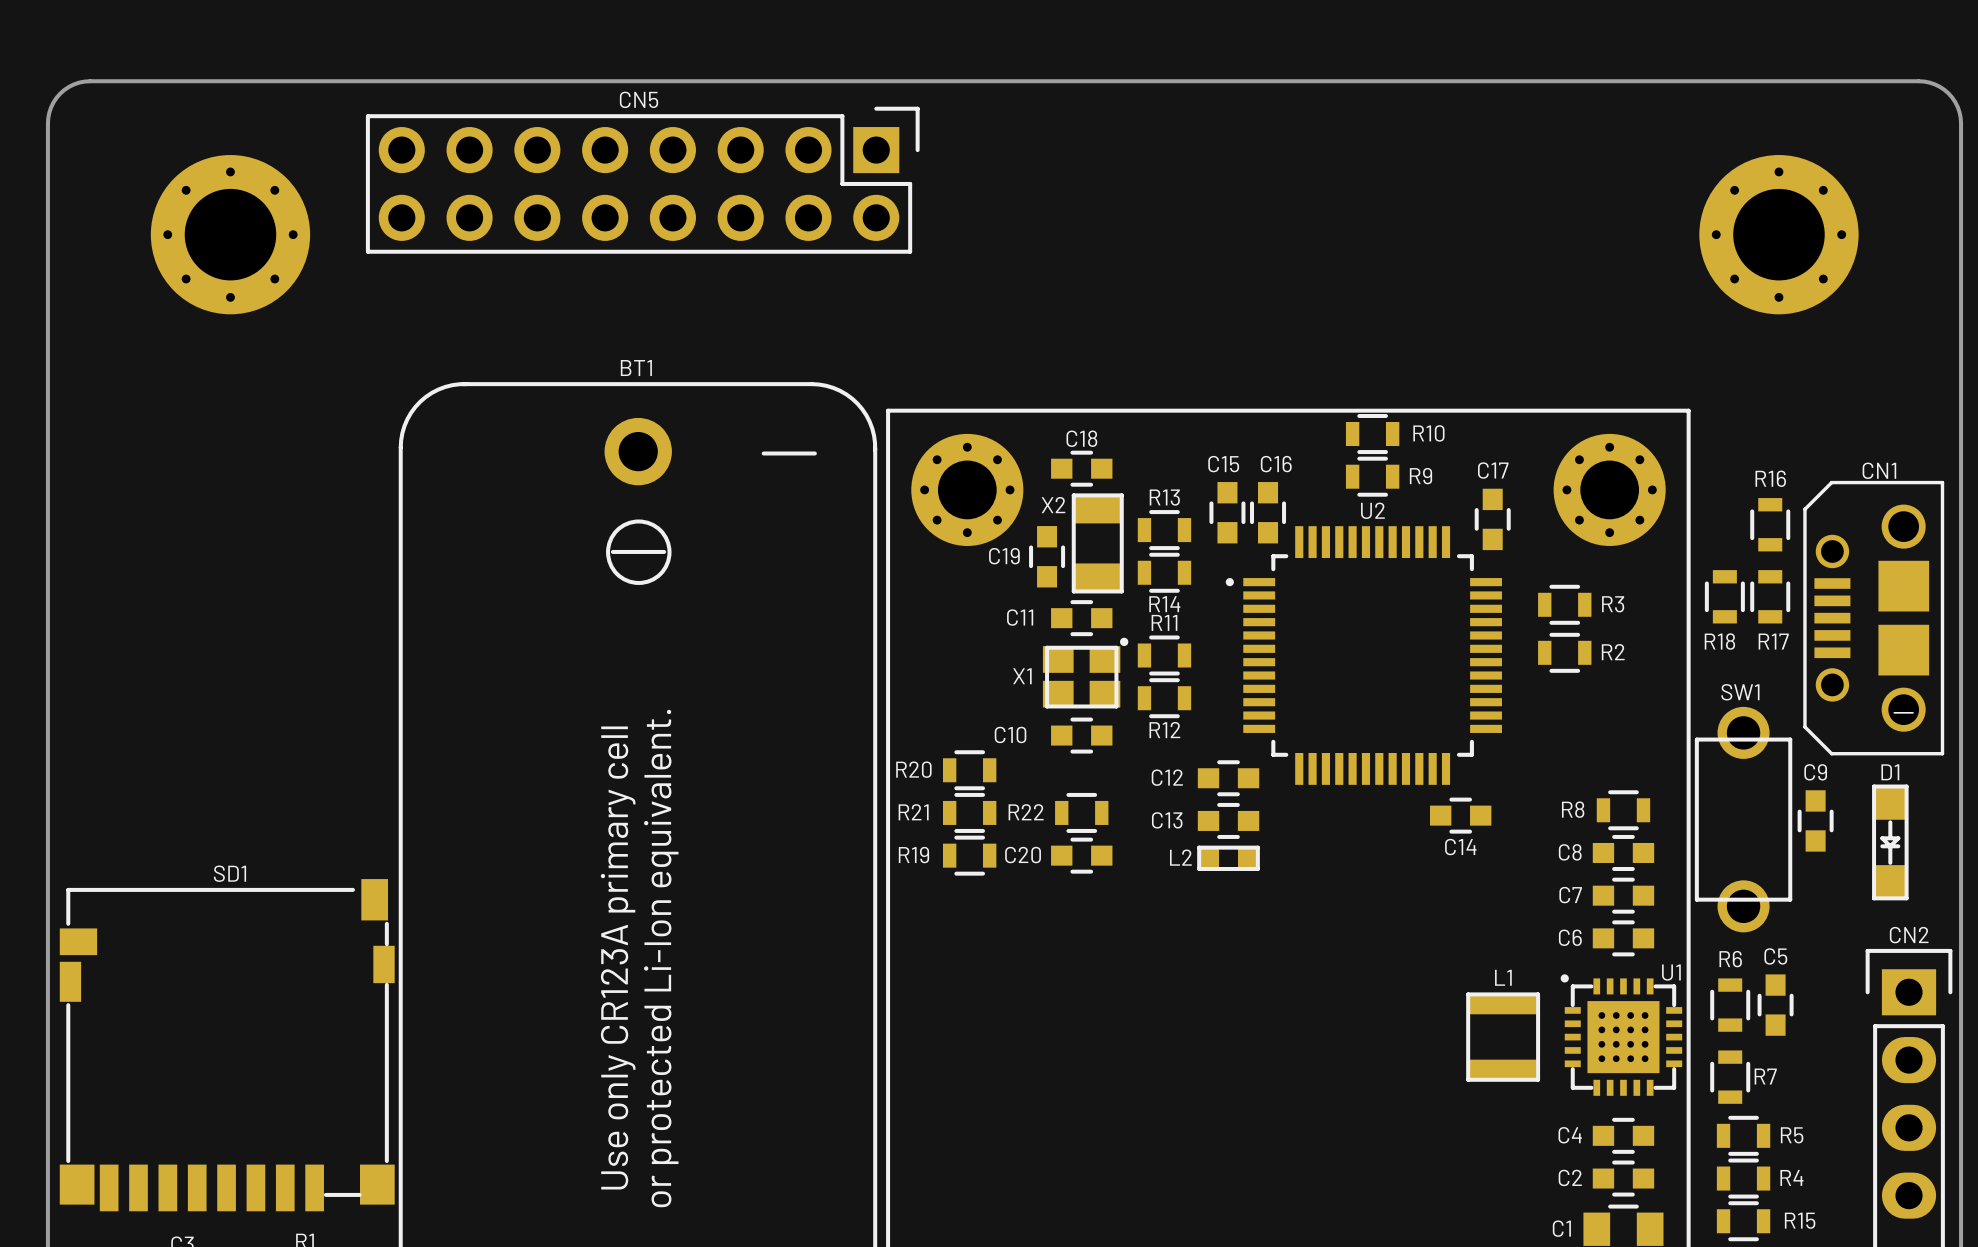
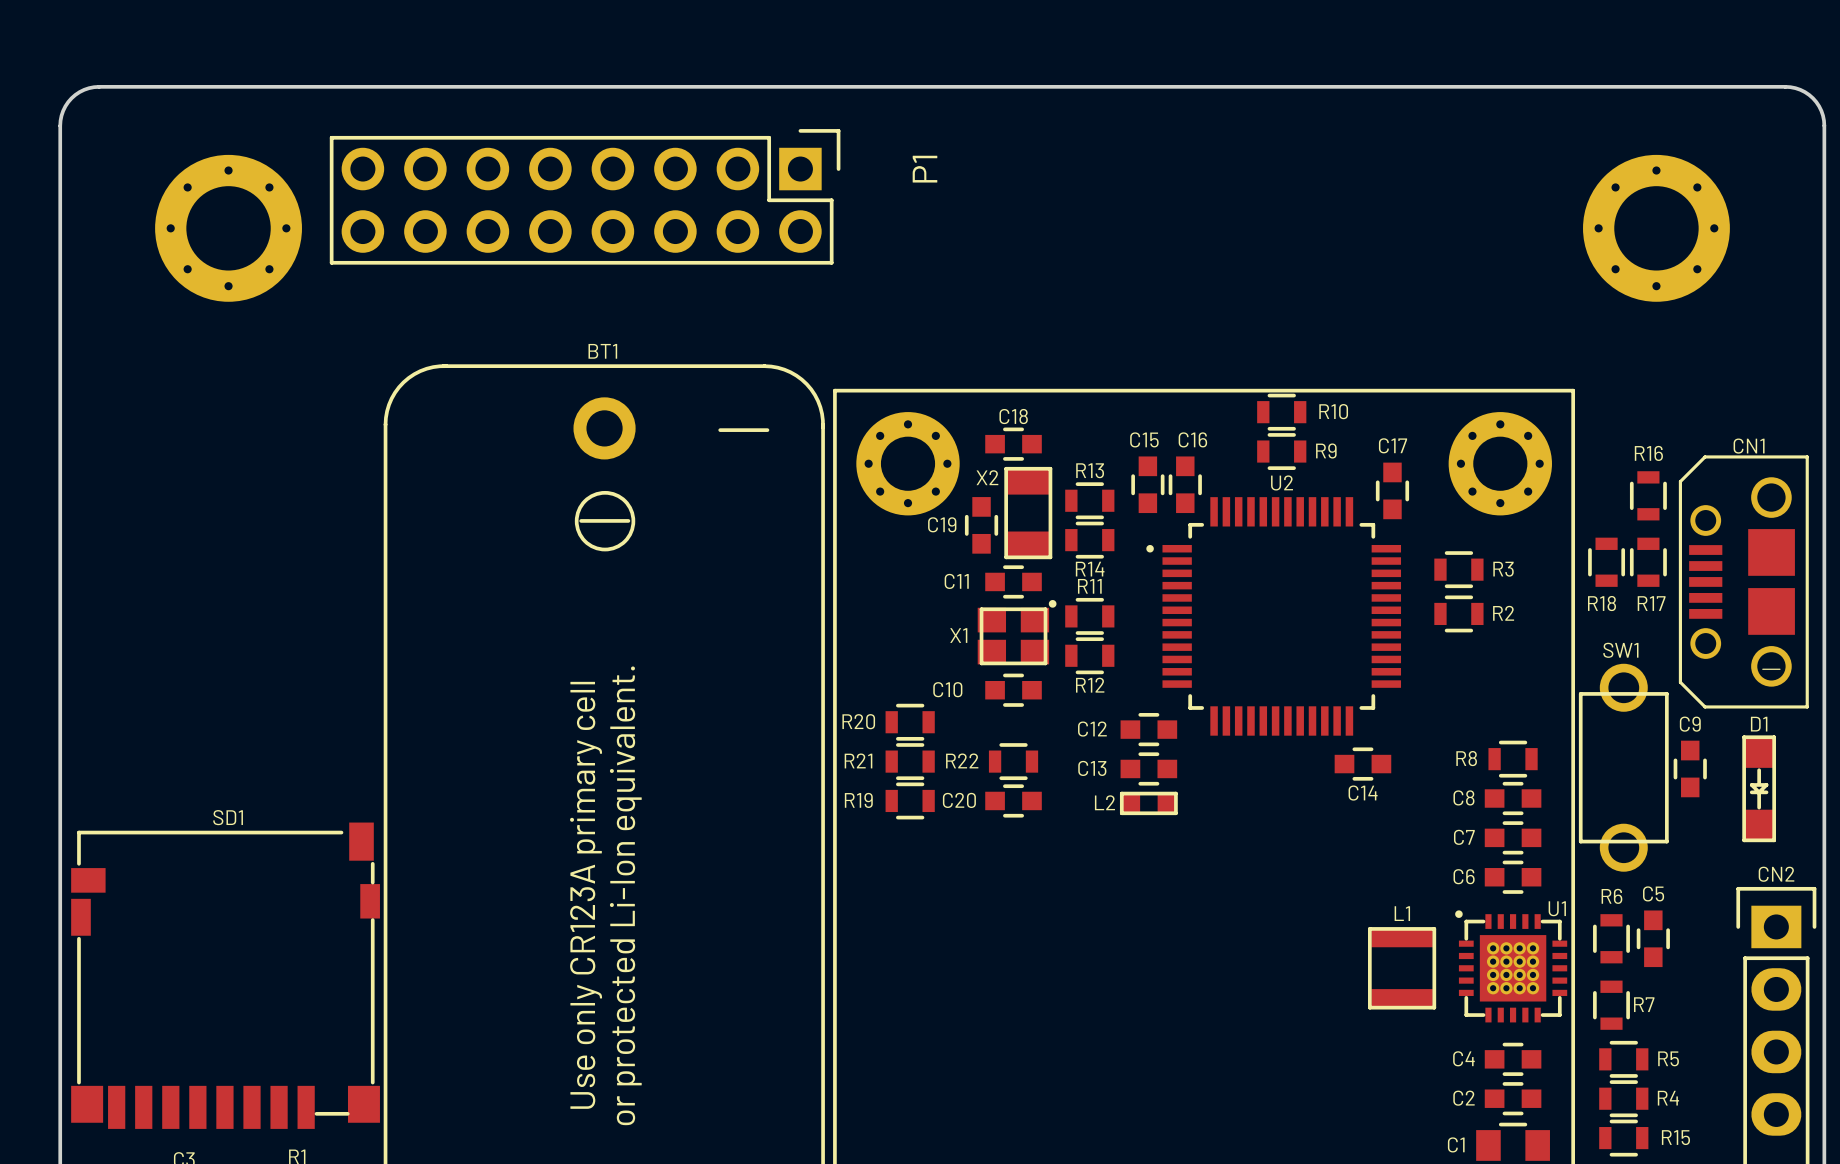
CN5: (642, 180) -> none
P1: none -> (585, 196)

